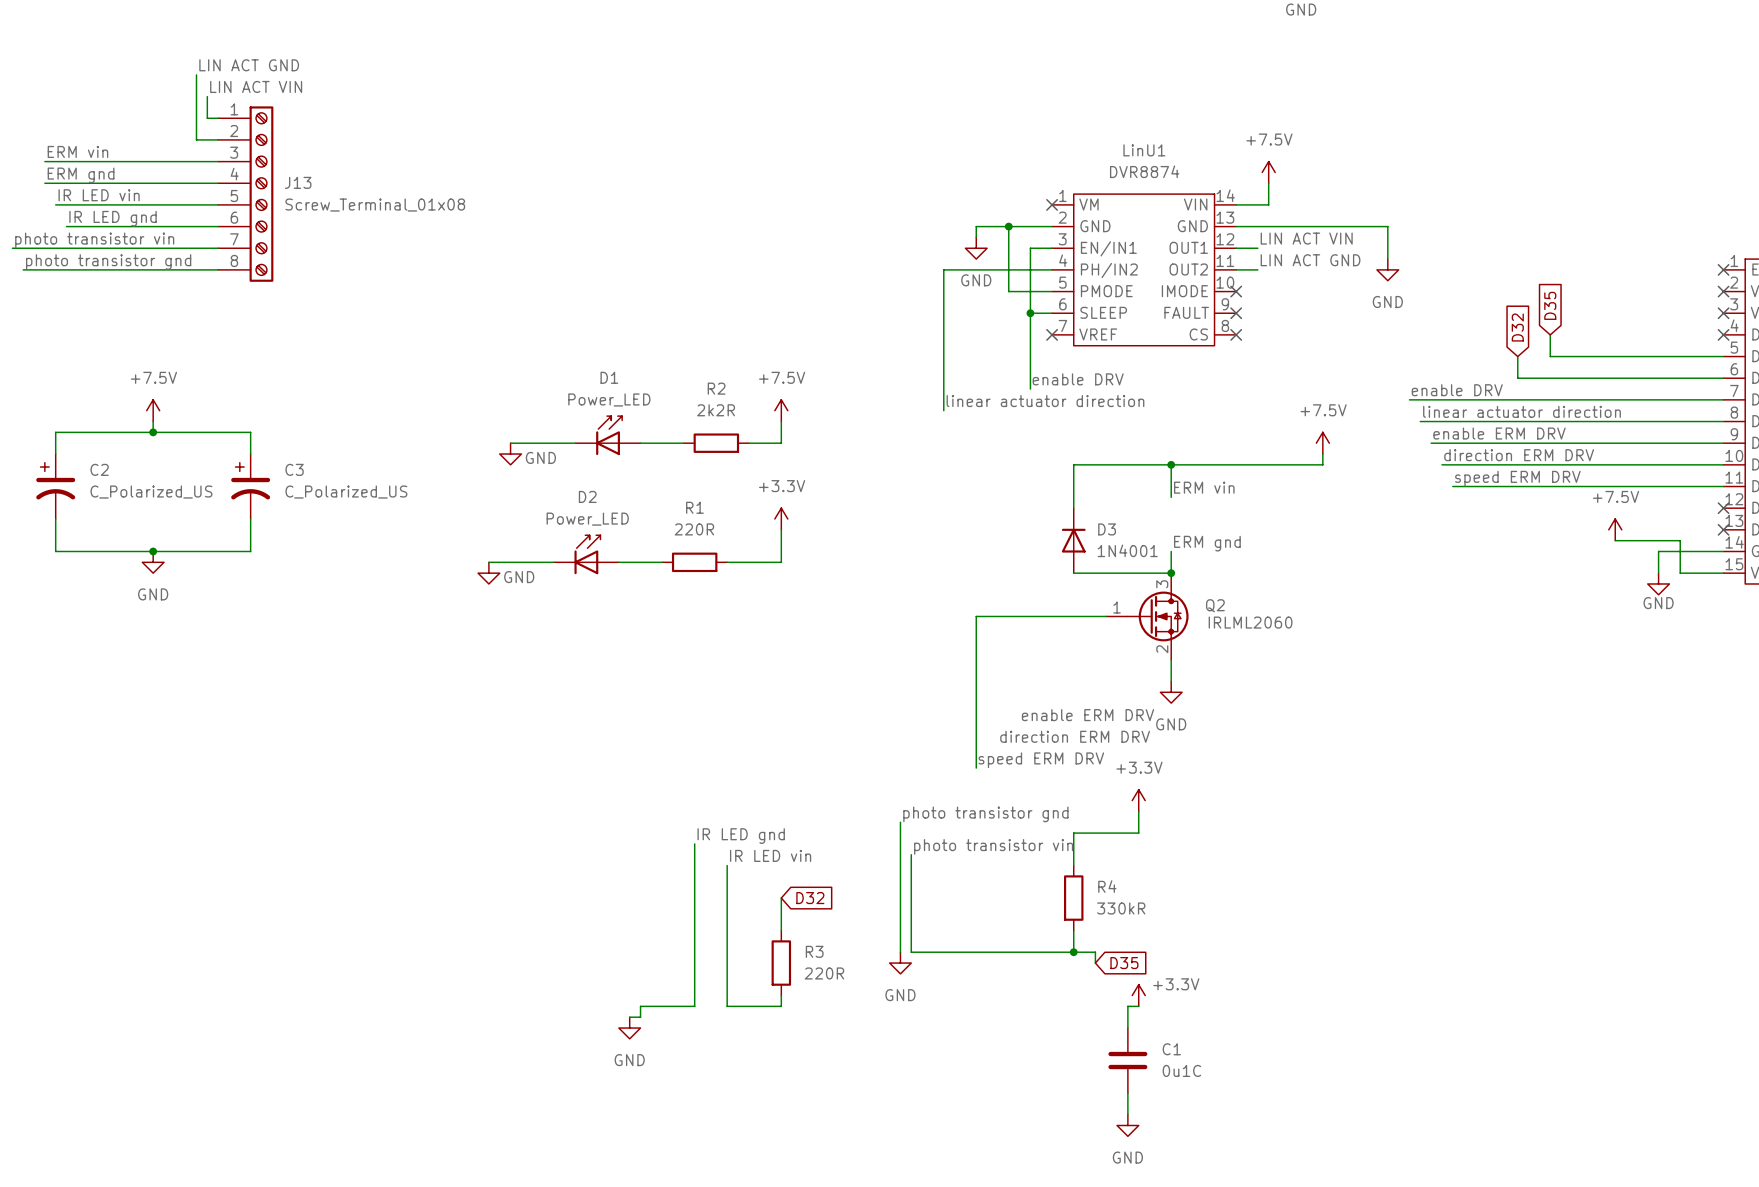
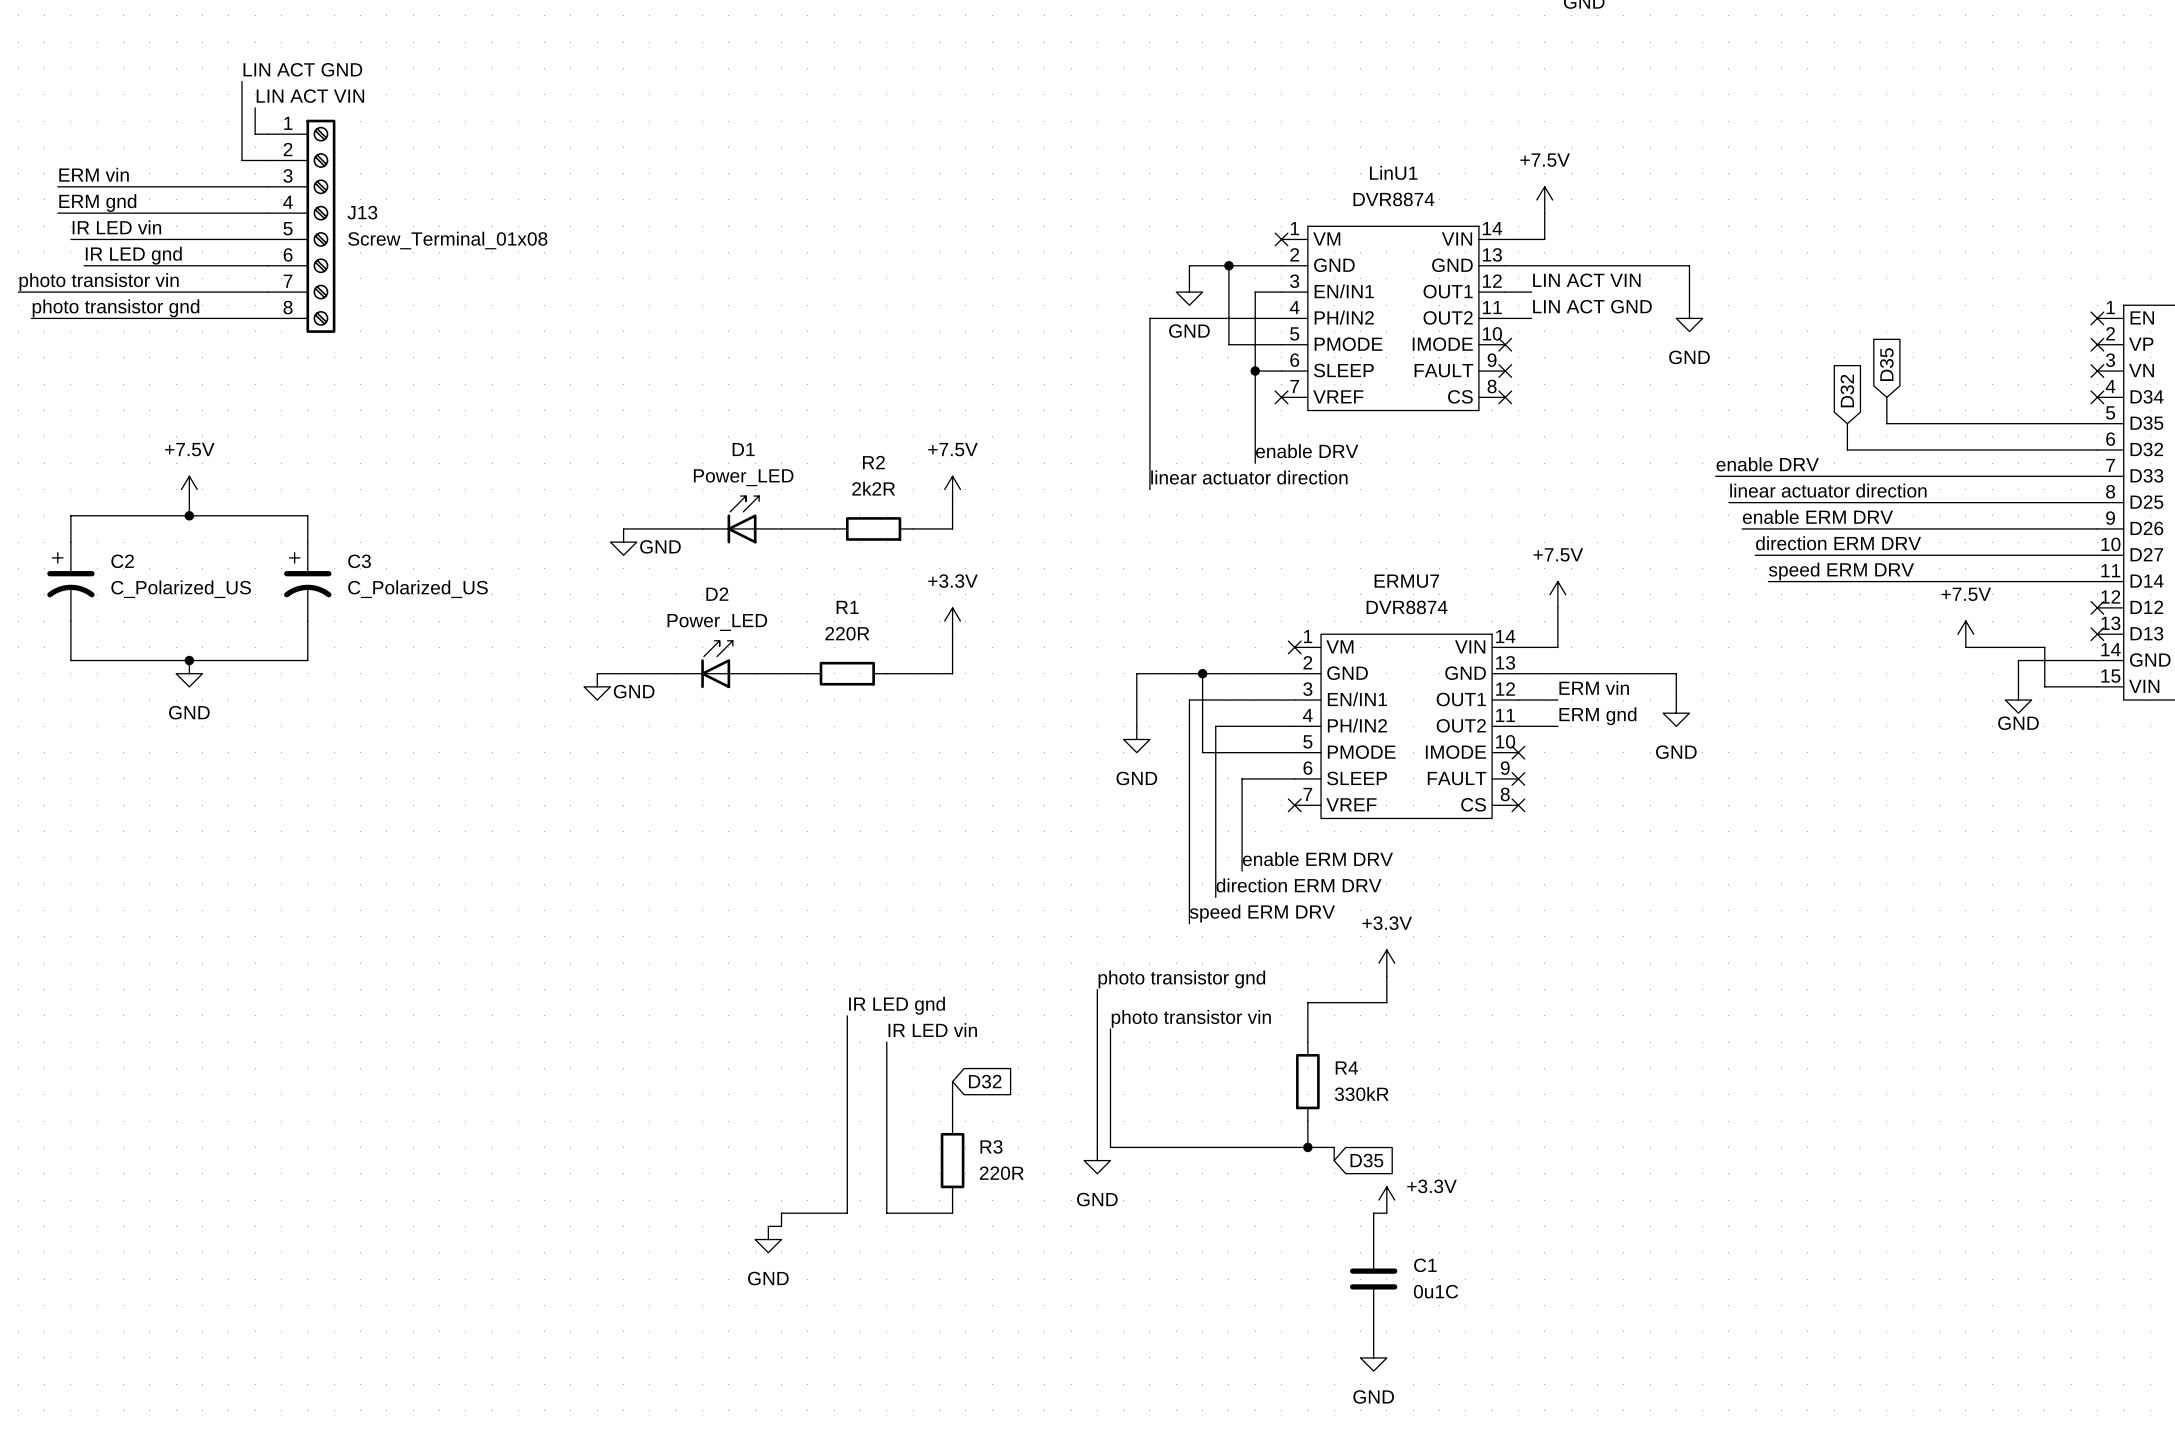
power symbol position: +7.5V (1322, 443) -> +7.5V (1557, 594)
wire: (1322, 454) (1322, 464) (1073, 464) (1073, 508) -> none
wire: (1171, 464) (1171, 497) -> none
junction: (1171, 464) -> none
label position: ERM vin (1204, 487) -> ERM vin (1594, 687)
wire: none -> (1557, 607) (1557, 647) (1518, 647)
no-connect mark: none -> (1294, 647)
D3: 1N4001 (1073, 540) -> none
label position: ERM gnd (1207, 543) -> ERM gnd (1597, 716)
wire: (1171, 551) (1171, 573) (1073, 573) -> none
wire: none -> (1202, 673) (1202, 752) (1294, 752)
junction: none -> (1202, 673)
wire: none -> (1294, 673) (1136, 673) (1136, 726)
wire: none -> (1518, 673) (1676, 673) (1676, 700)
junction: (1171, 573) -> none
wire: none -> (1518, 700) (1557, 700)
power symbol: none -> GND (1676, 713)
wire: none -> (1294, 726) (1215, 726) (1215, 897)
ERMU7: none -> DVR8874 (1406, 726)
wire: none -> (1518, 726) (1557, 726)
power symbol: none -> GND (1136, 739)
wire: (976, 616) (1106, 616) -> (1189, 739) (1189, 700) (1294, 700)
Q2: IRLML2060 (1147, 616) -> none
no-connect mark: none -> (1518, 752)
wire: none -> (1294, 778) (1242, 778) (1242, 871)
no-connect mark: none -> (1518, 778)
wire: (1171, 659) (1171, 681) -> none
no-connect mark: none -> (1294, 805)
no-connect mark: none -> (1518, 805)
power symbol: GND (1171, 692) -> none

